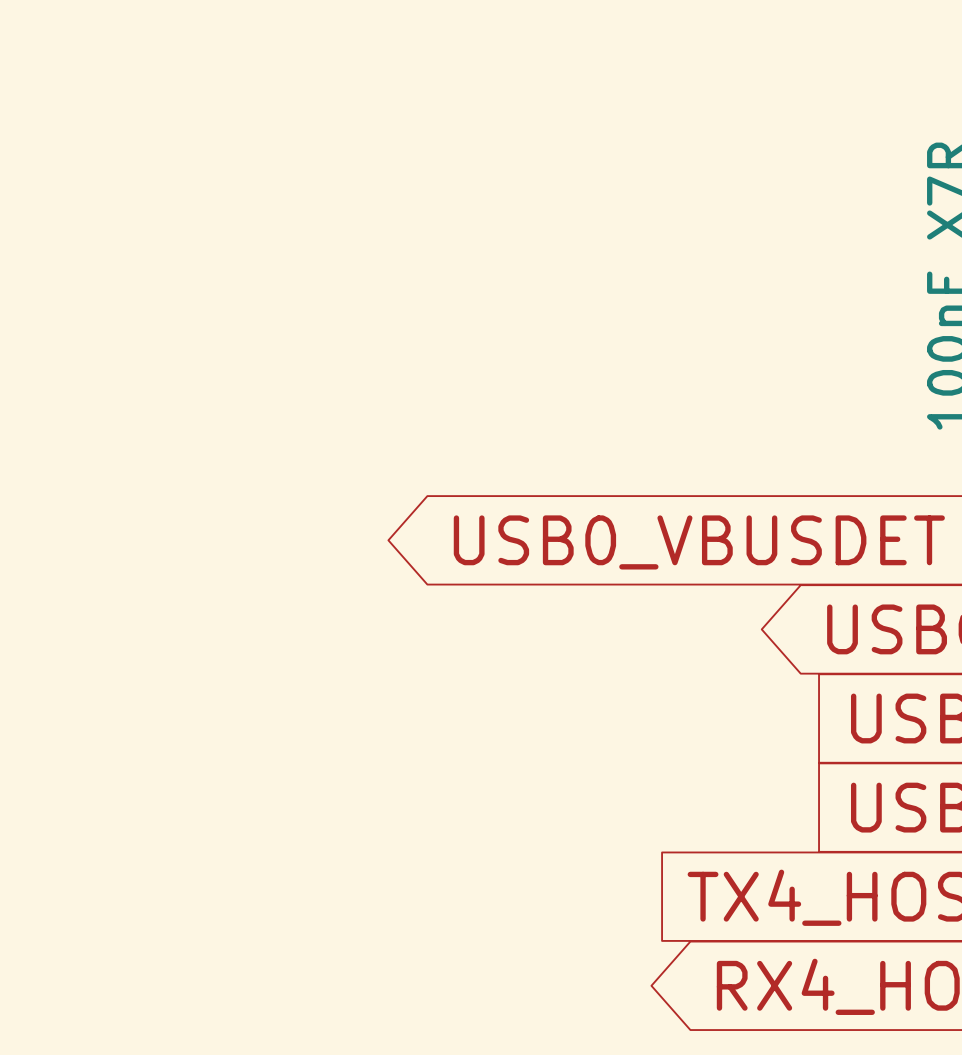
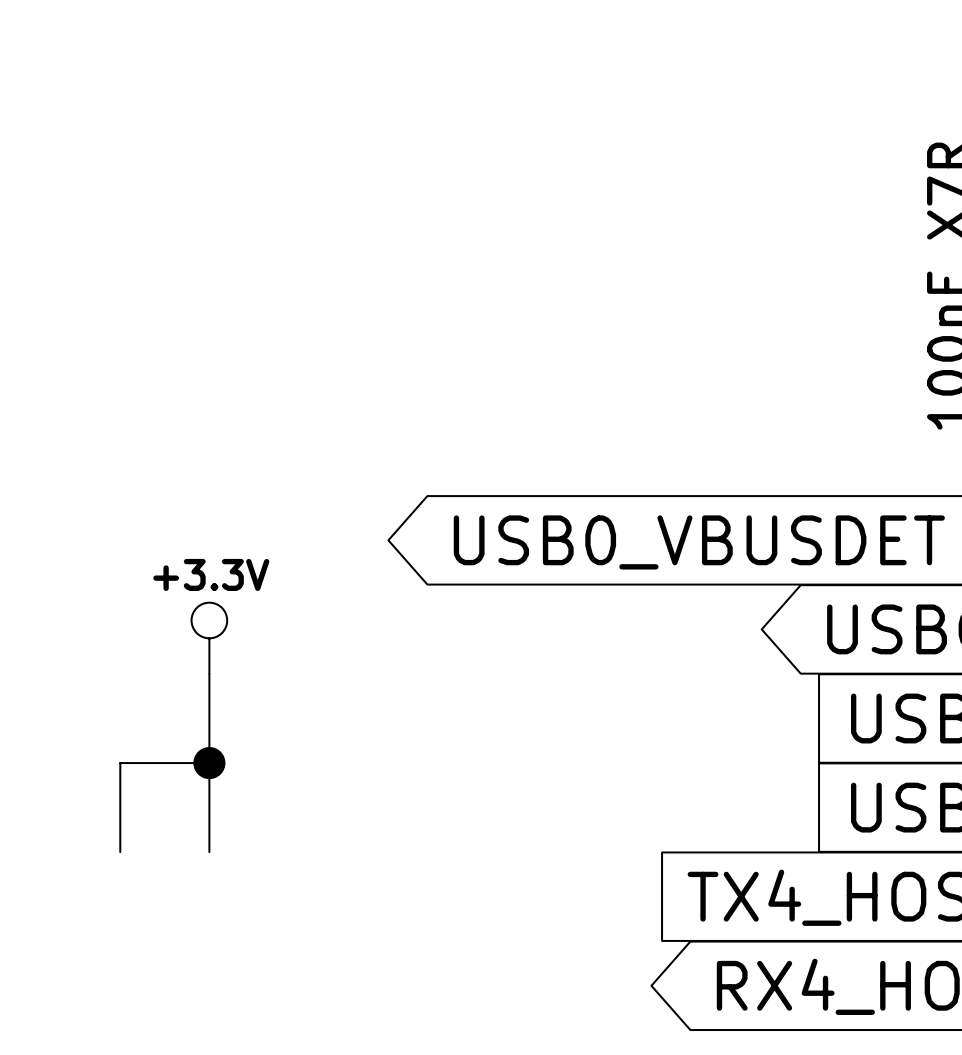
power symbol: none -> +3.3V (209, 638)
wire: none -> (209, 673) (209, 852)
wire: none -> (209, 763) (120, 763) (120, 852)
junction: none -> (209, 763)

